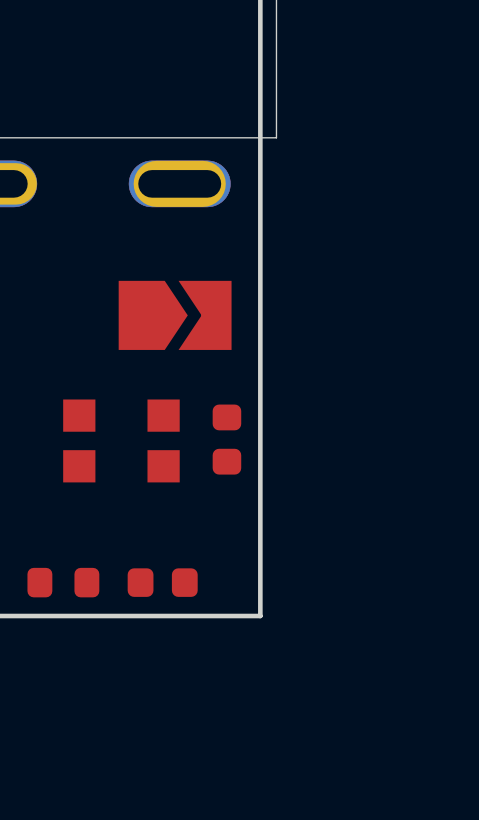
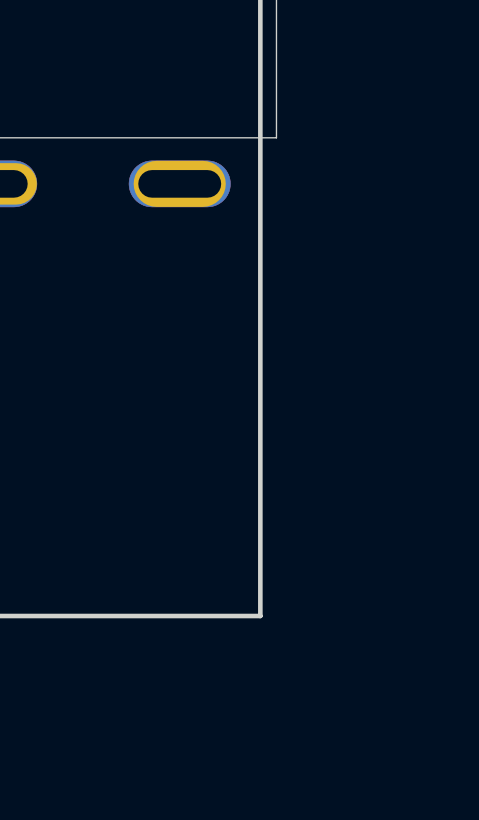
part: (175, 315) -> none
part: (226, 439) -> none
part: (121, 440) -> none
part: (63, 582) -> none
part: (162, 582) -> none

